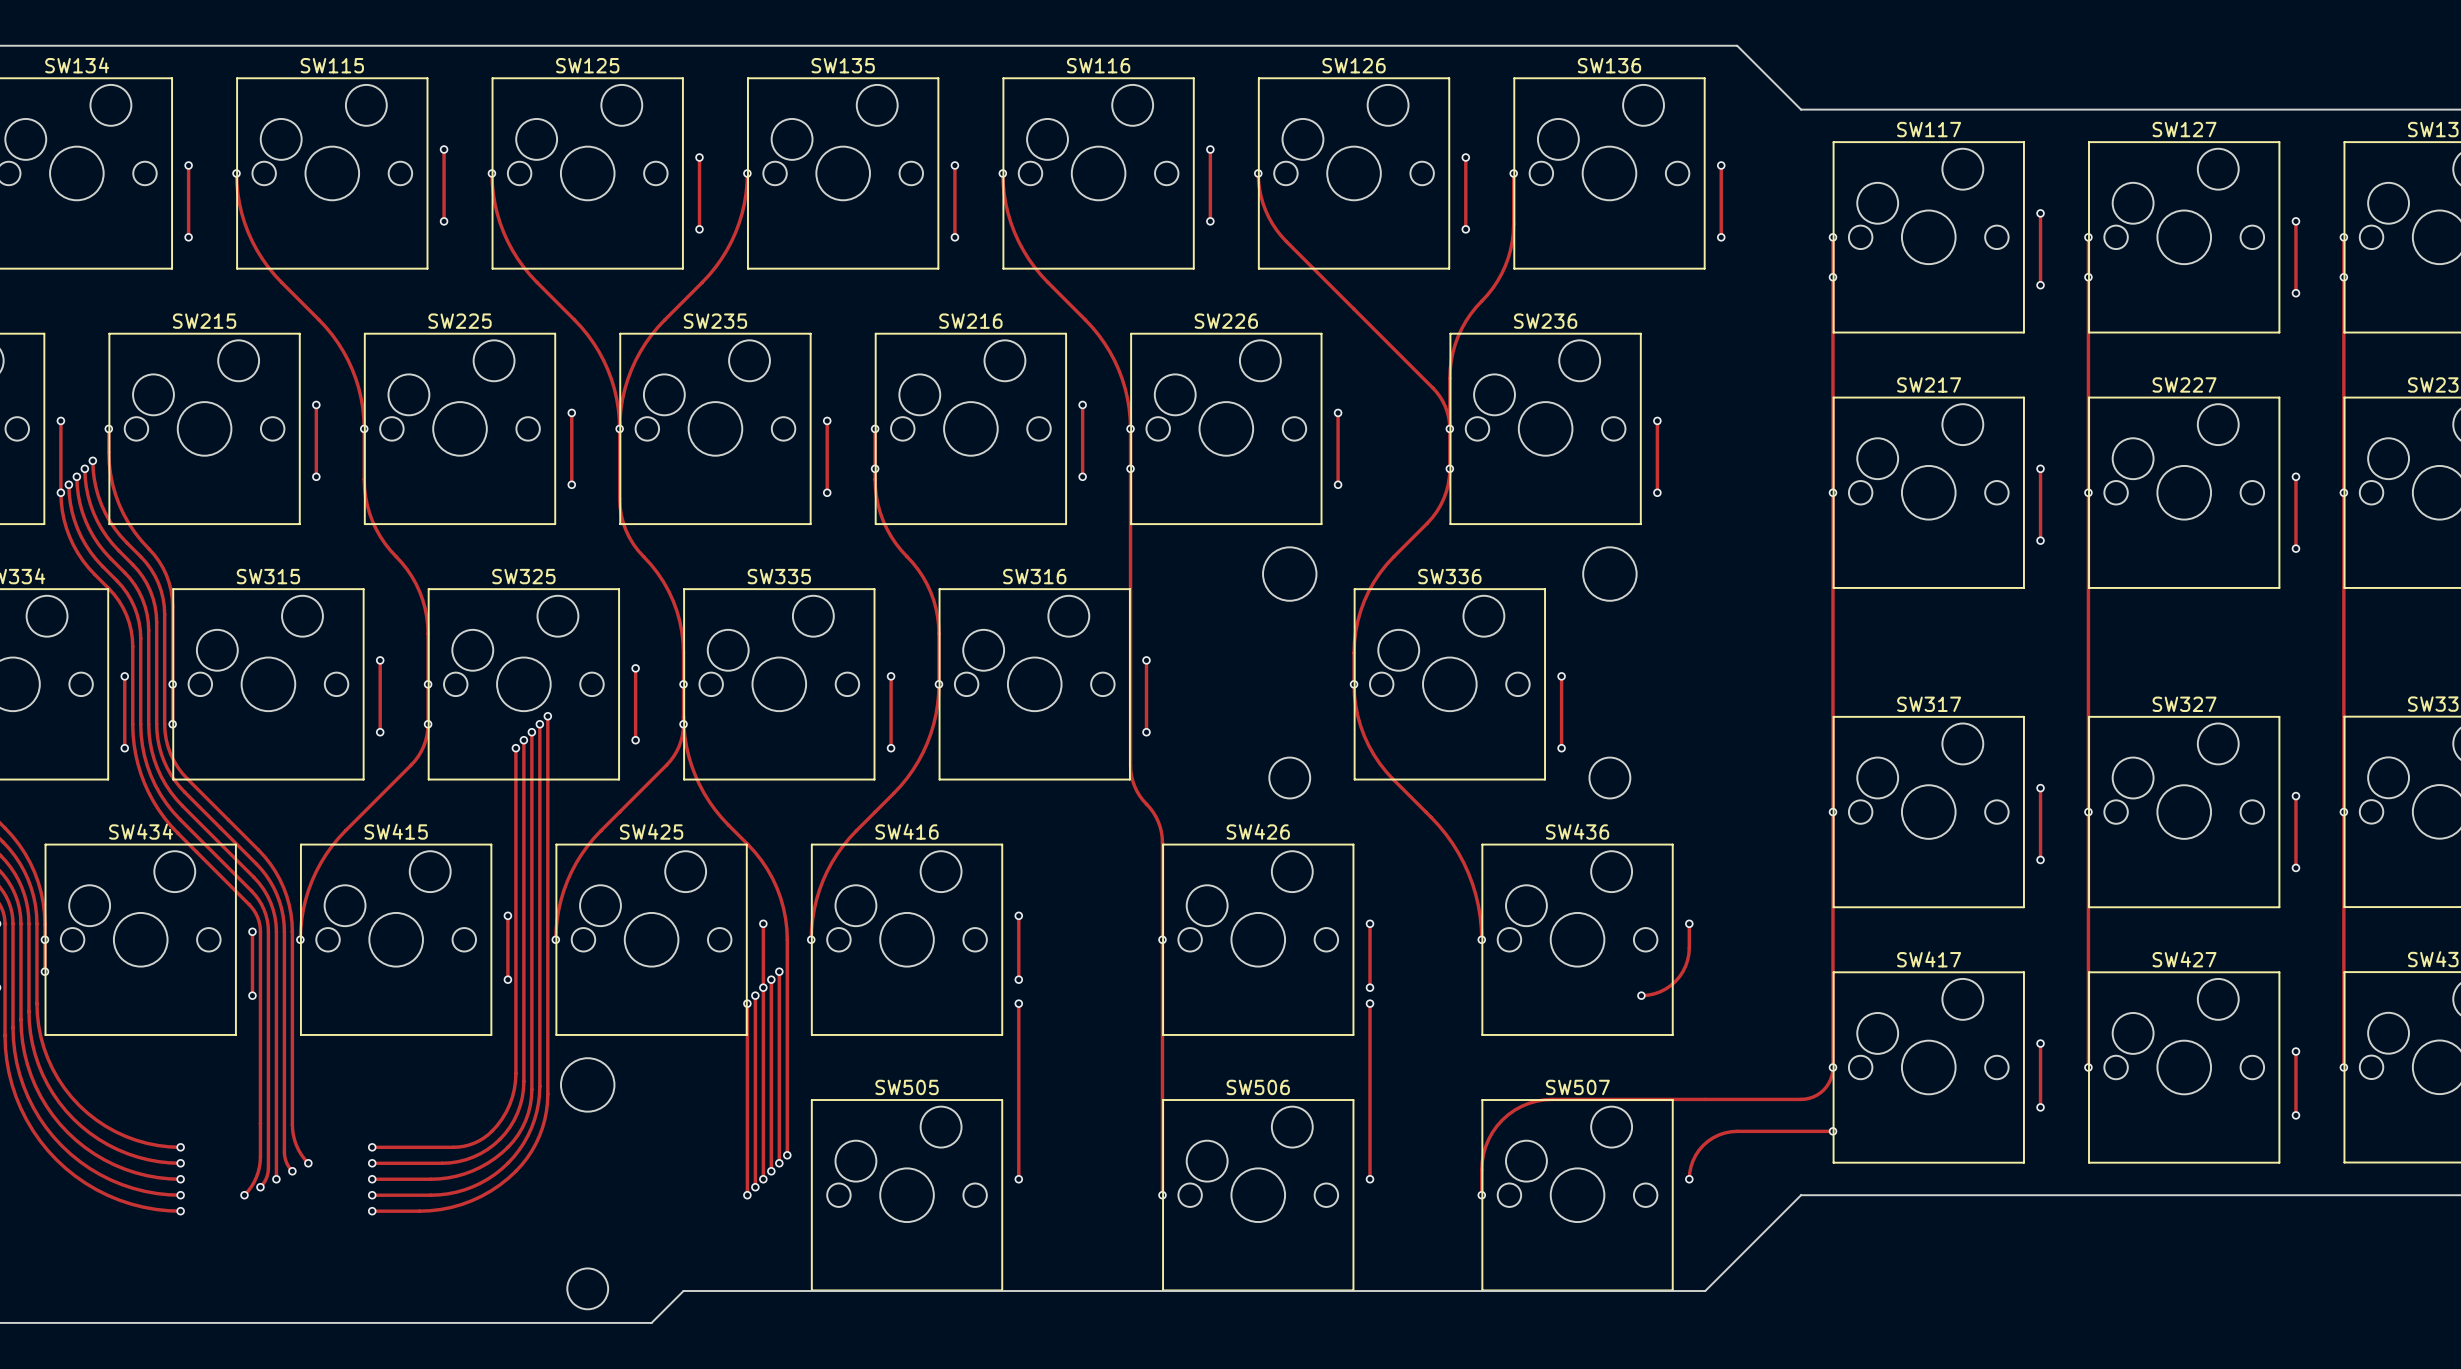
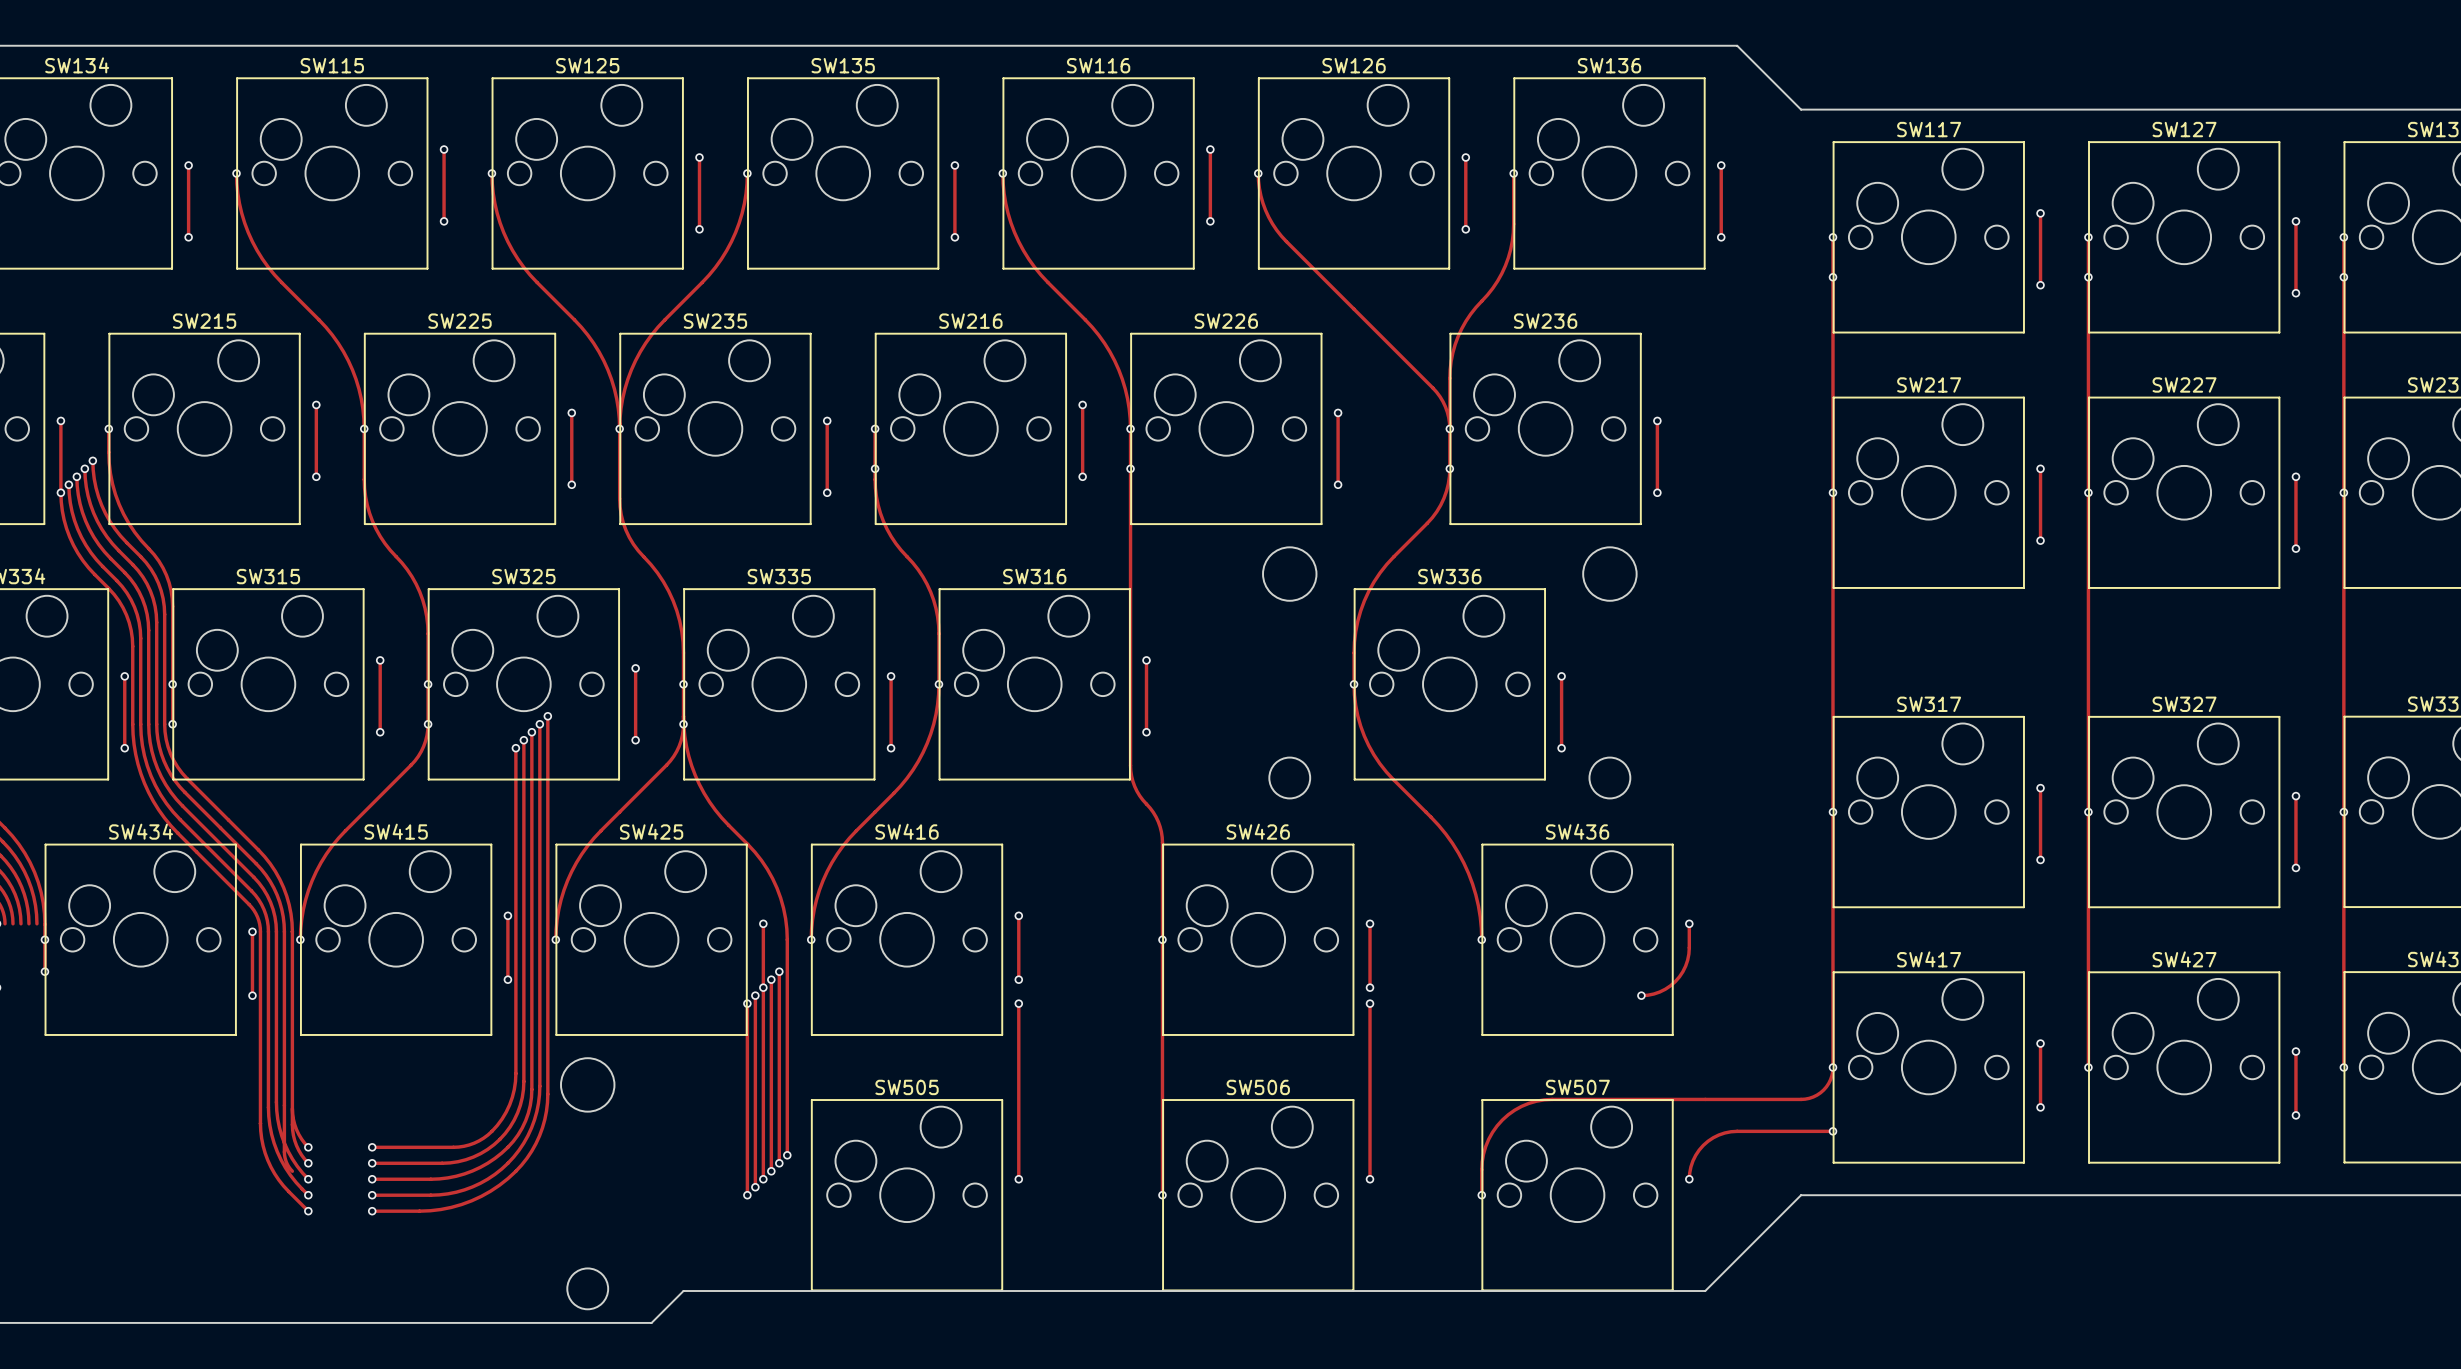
track: (5, 923) (6, 1060) (16, 1096) (32, 1130) (56, 1159) (75, 1176) (96, 1189) (119, 1200) (143, 1207) (180, 1211) -> none
track: (13, 923) (14, 1051) (23, 1086) (39, 1118) (53, 1137) (70, 1154) (100, 1174) (122, 1184) (145, 1191) (180, 1195) -> none
track: (20, 923) (22, 1042) (31, 1075) (46, 1105) (67, 1132) (84, 1147) (104, 1159) (124, 1169) (146, 1175) (180, 1179) -> none
track: (28, 923) (30, 1033) (38, 1064) (53, 1093) (73, 1118) (89, 1133) (107, 1144) (127, 1153) (148, 1159) (180, 1163) -> none
track: (36, 923) (38, 1026) (43, 1048) (58, 1078) (79, 1105) (105, 1126) (136, 1140) (158, 1145) (180, 1147) -> none
track: (276, 1102) (276, 1179) -> (276, 1102) (279, 1127) (284, 1143) (292, 1159) (308, 1179)
track: (268, 1107) (268, 1171) (260, 1187) -> (268, 1107) (271, 1134) (277, 1151) (290, 1175) (308, 1195)
track: none -> (292, 1108) (296, 1129) (308, 1147)
track: (260, 1123) (259, 1167) (254, 1182) (244, 1195) -> (260, 1123) (263, 1145) (270, 1167) (283, 1185) (308, 1211)
via: (180, 1147) -> none
via: none -> (308, 1147)
via: (180, 1163) -> none
via: (292, 1171) -> none
via: (180, 1179) -> none
via: (276, 1179) -> none
via: none -> (308, 1179)
via: (260, 1187) -> none
via: (180, 1195) -> none
via: (244, 1195) -> none
via: none -> (308, 1195)
via: (180, 1211) -> none
via: none -> (308, 1211)

